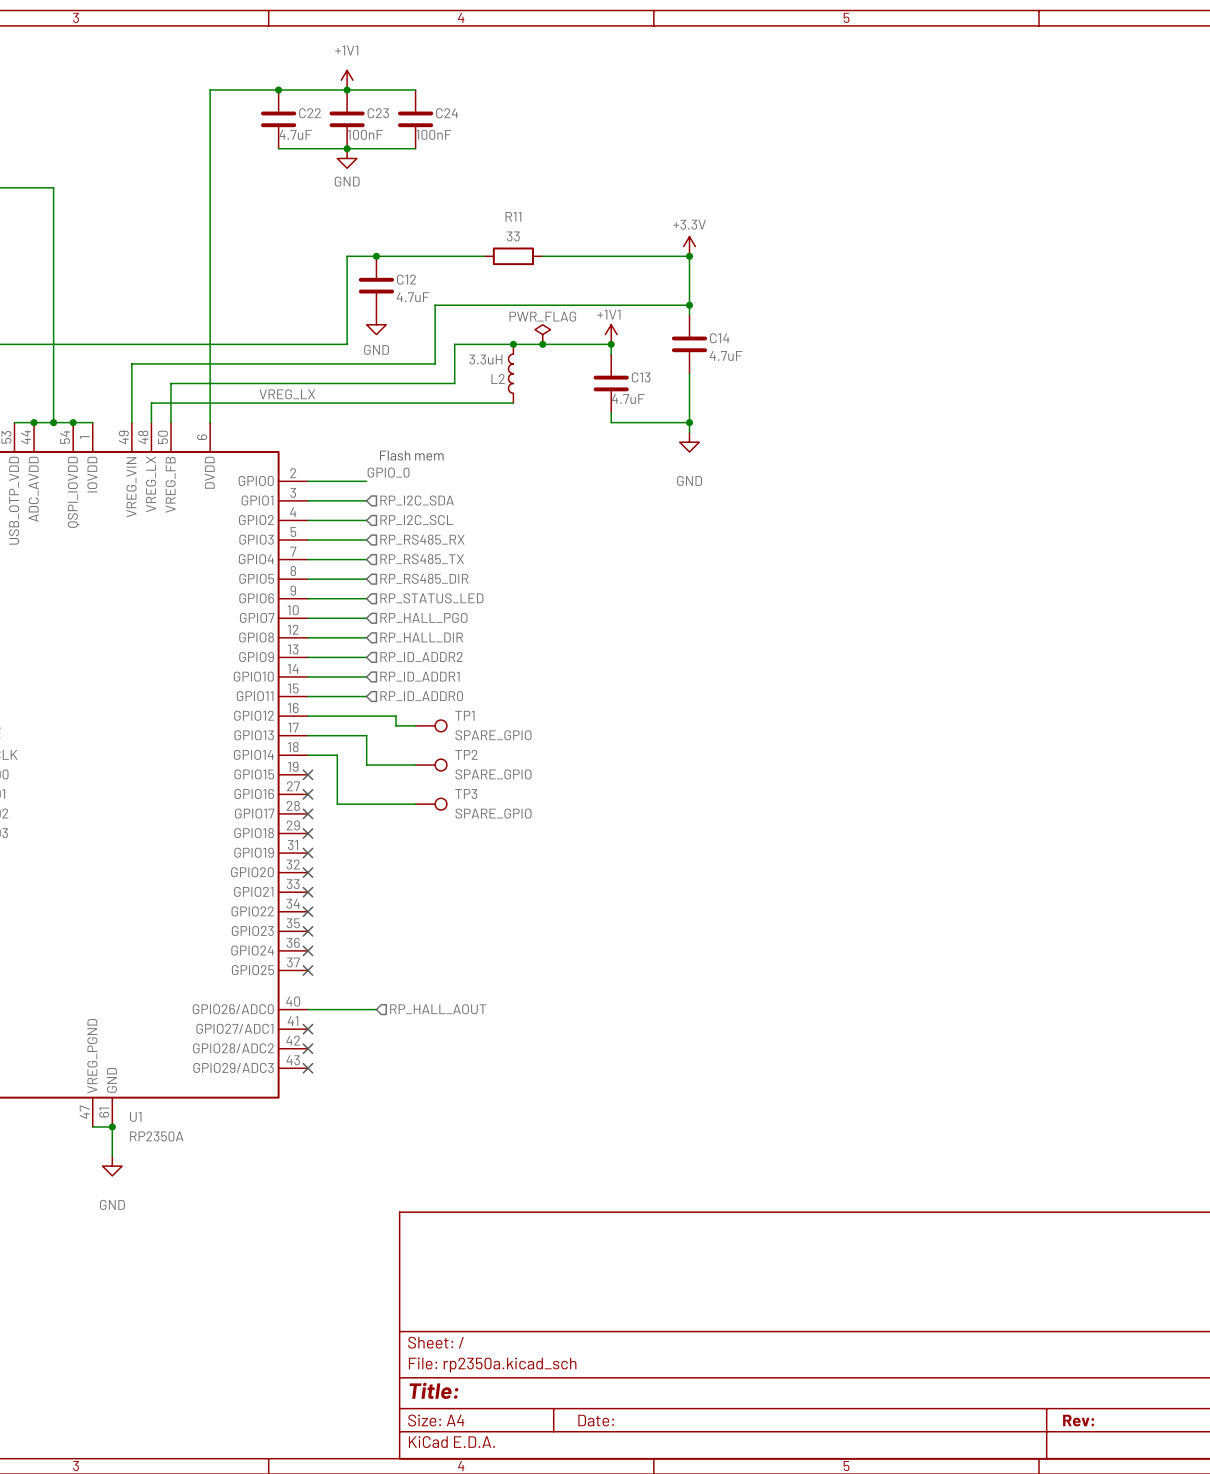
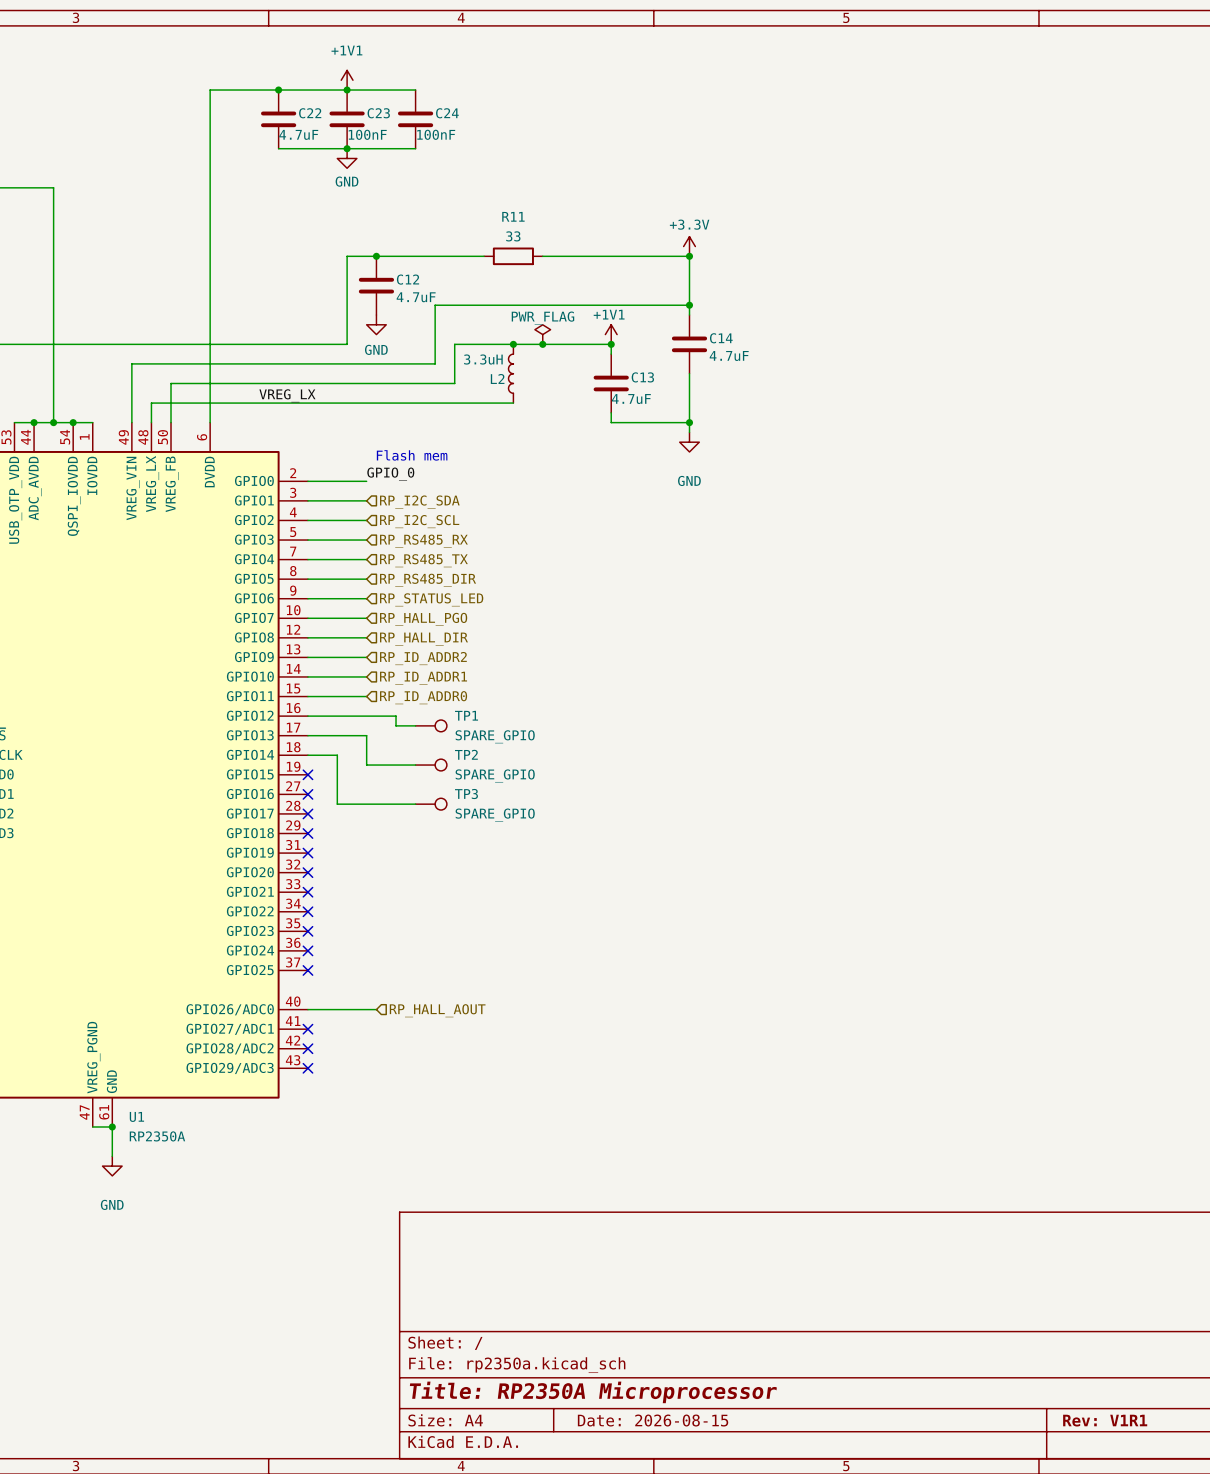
title block: Title: (434, 1390) -> Title: RP2350A Microprocessor (593, 1392)
title block: Date: (596, 1420) -> Date: 2026-08-15 (653, 1420)
title block: Rev: (1078, 1420) -> Rev: V1R1 (1105, 1420)

